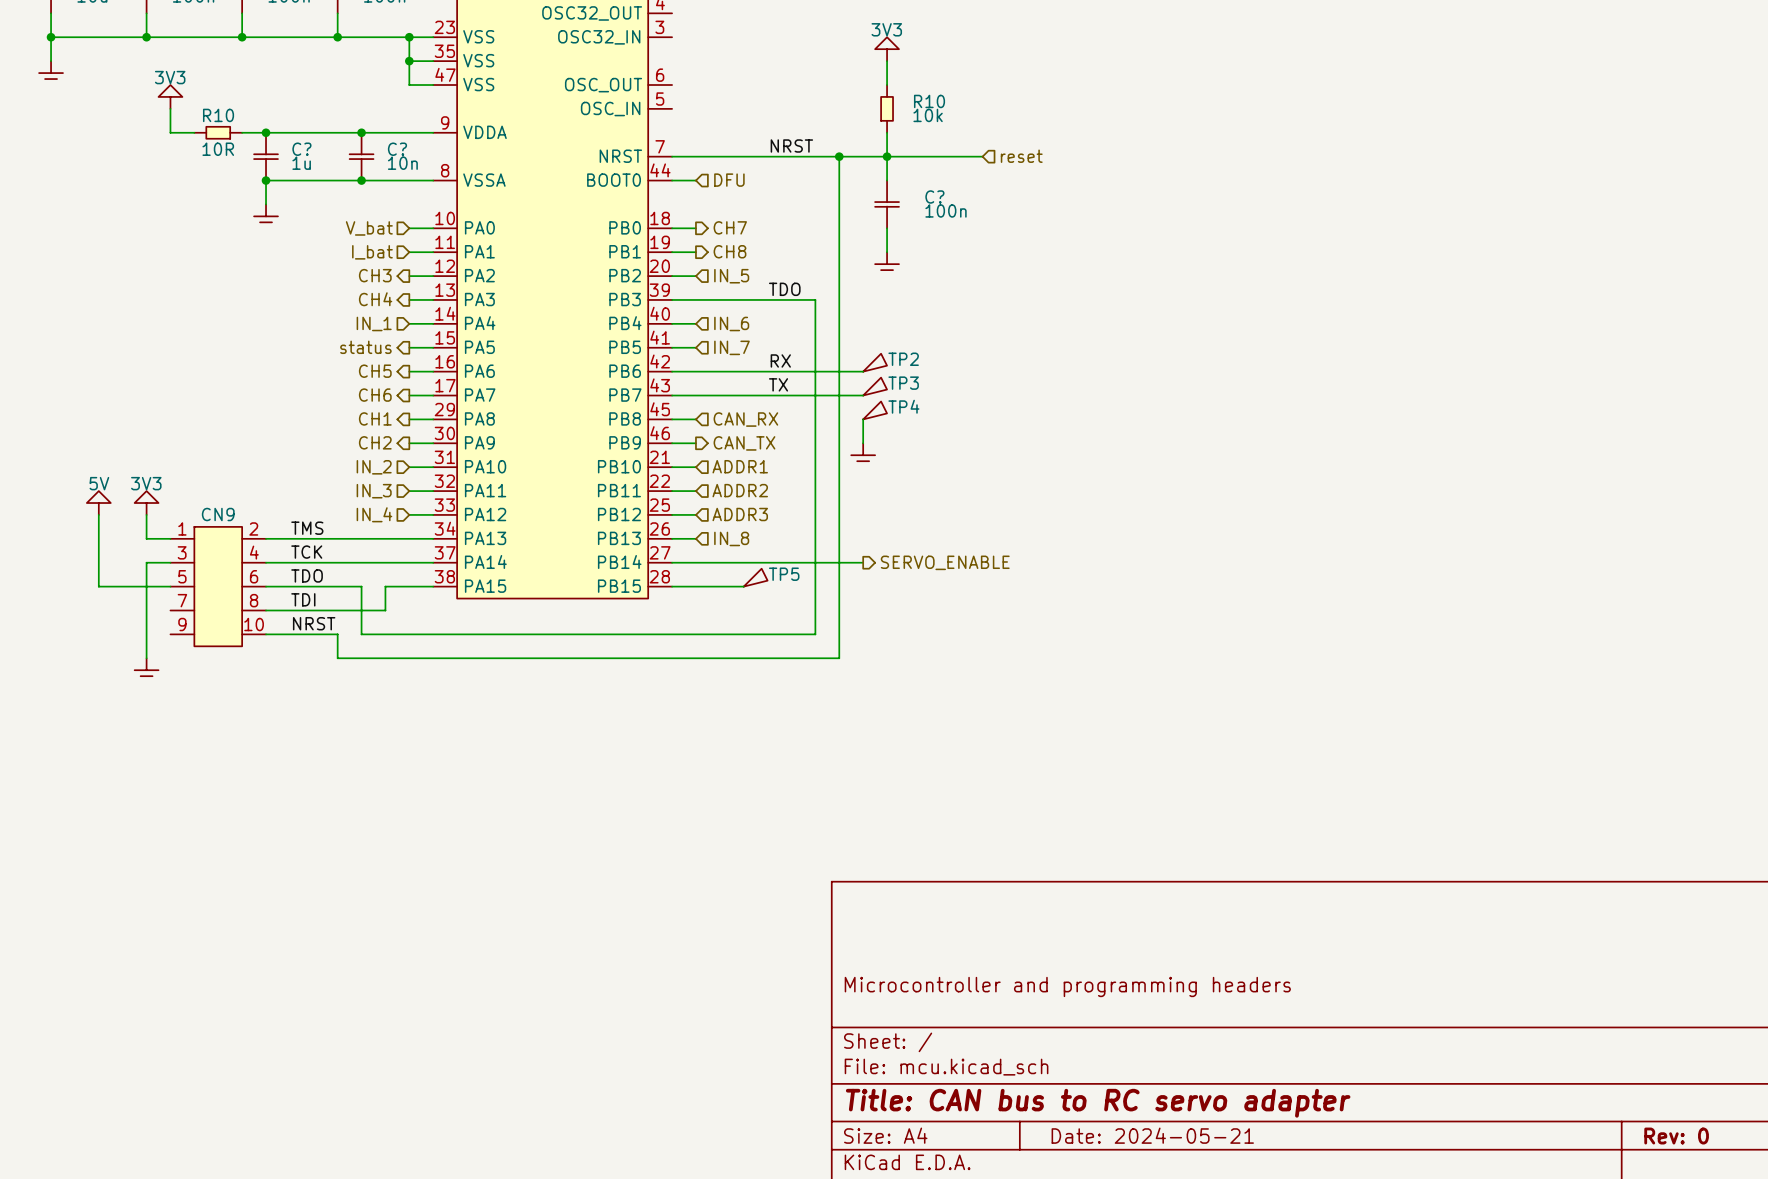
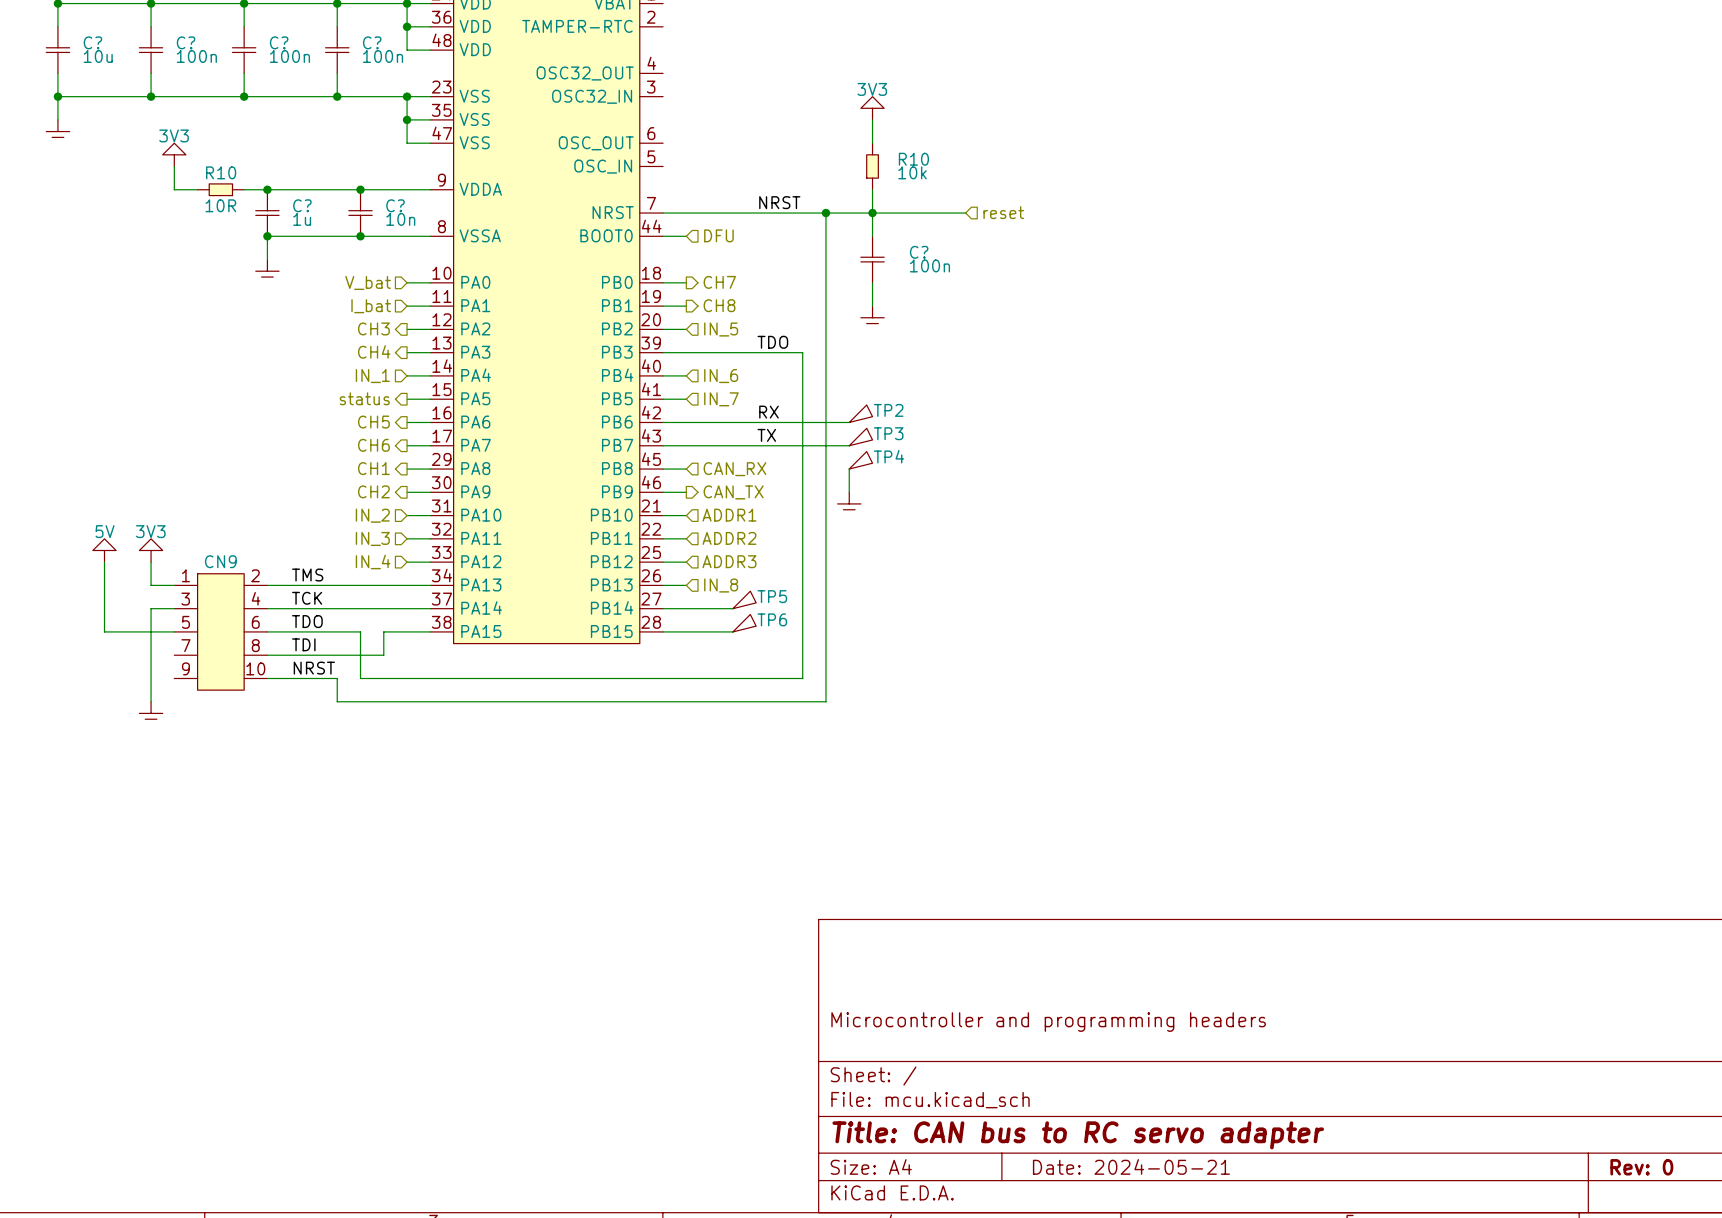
TP5: none -> (744, 599)
wire: (743, 562) (863, 562) -> none
hierarchical label: SERVO_ENABLE (945, 562) -> none
TP5 name: TP5 (784, 574) -> TP6 (772, 619)

